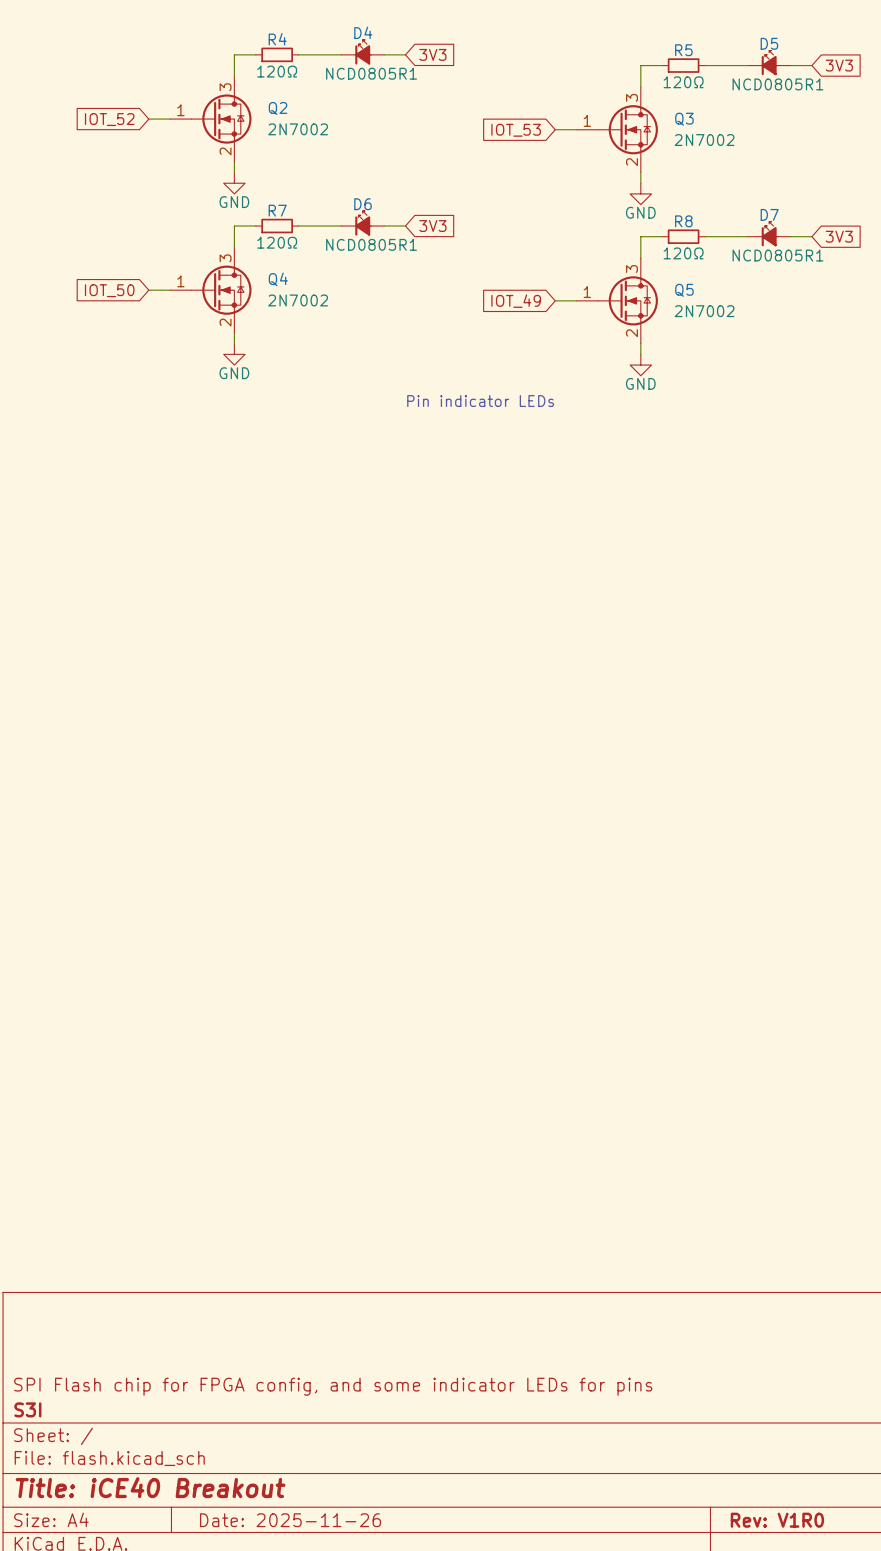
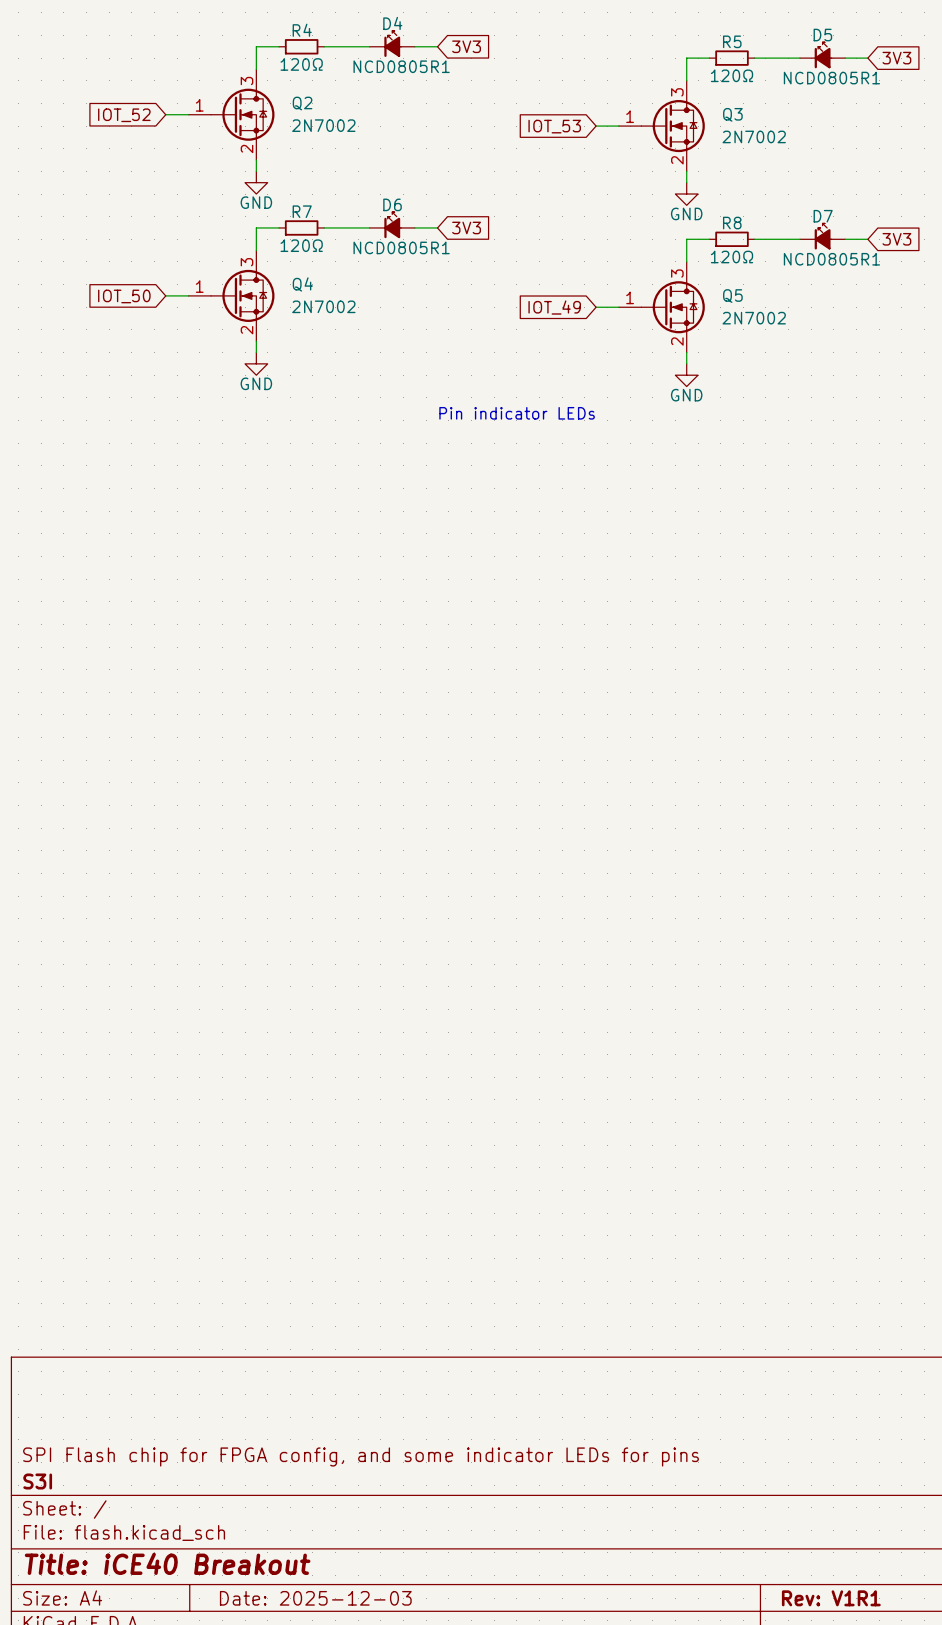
title block: Date: 2025-11-26 (290, 1520) -> Date: 2025-12-03 (315, 1598)
title block: Rev: V1R0 (777, 1520) -> Rev: V1R1 (831, 1598)

